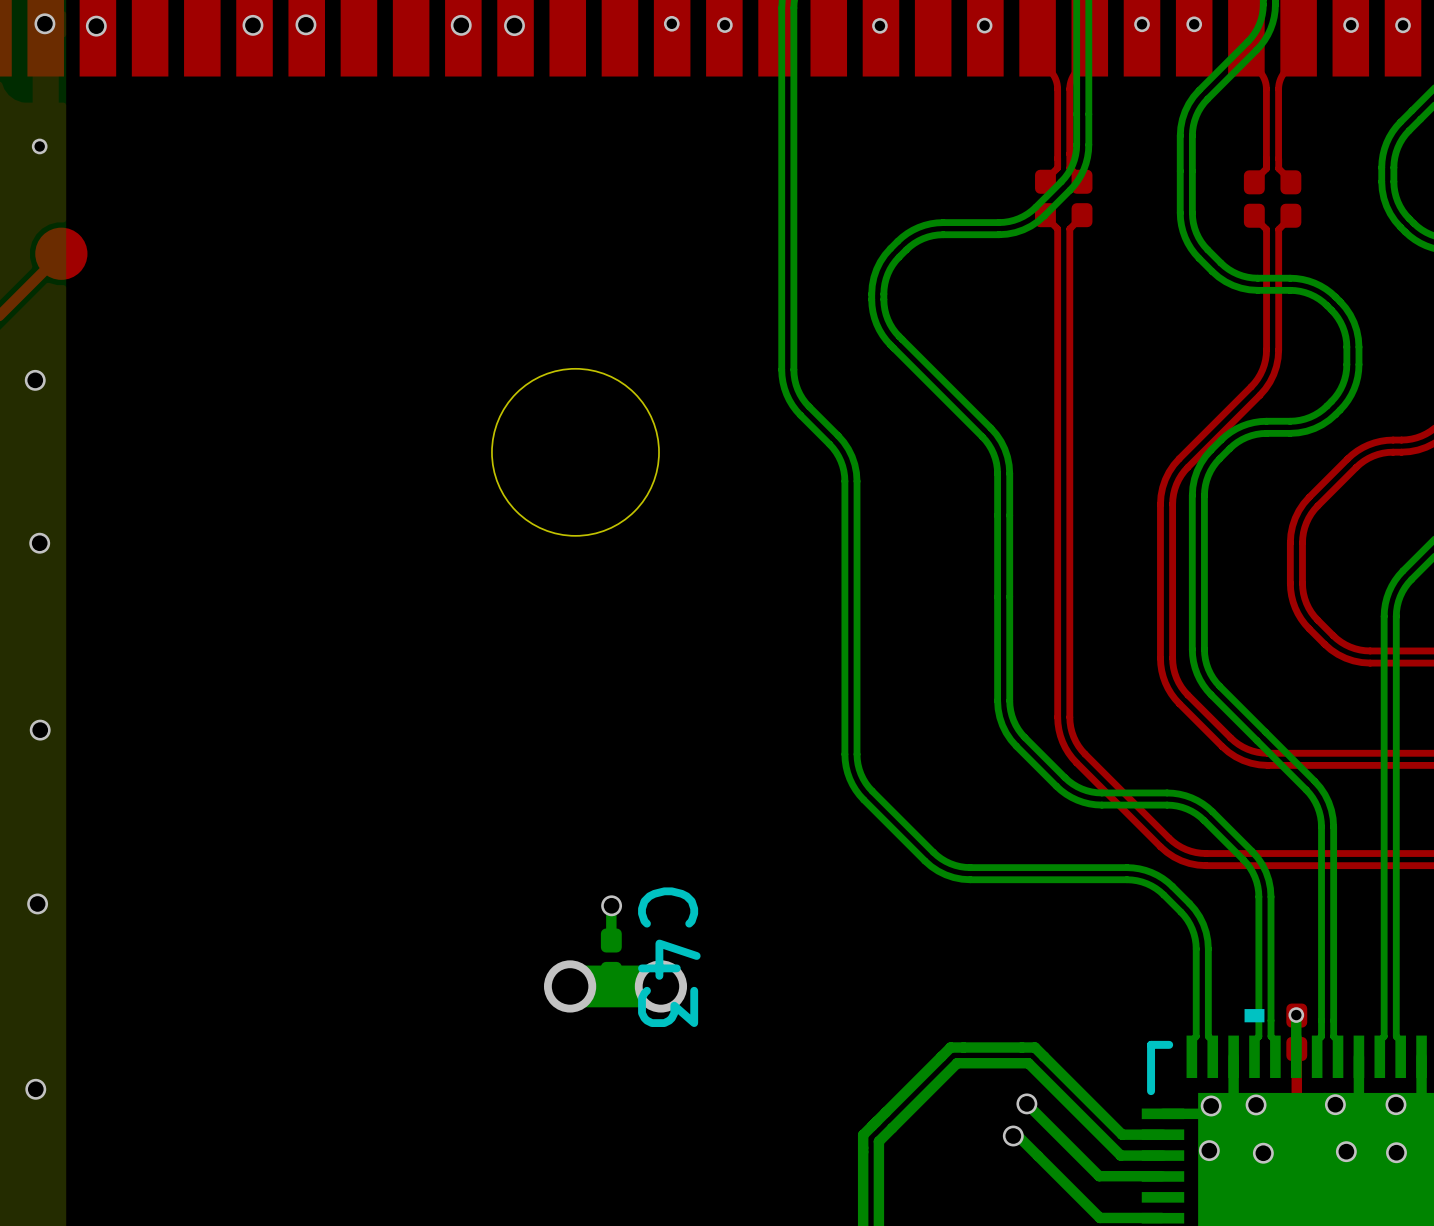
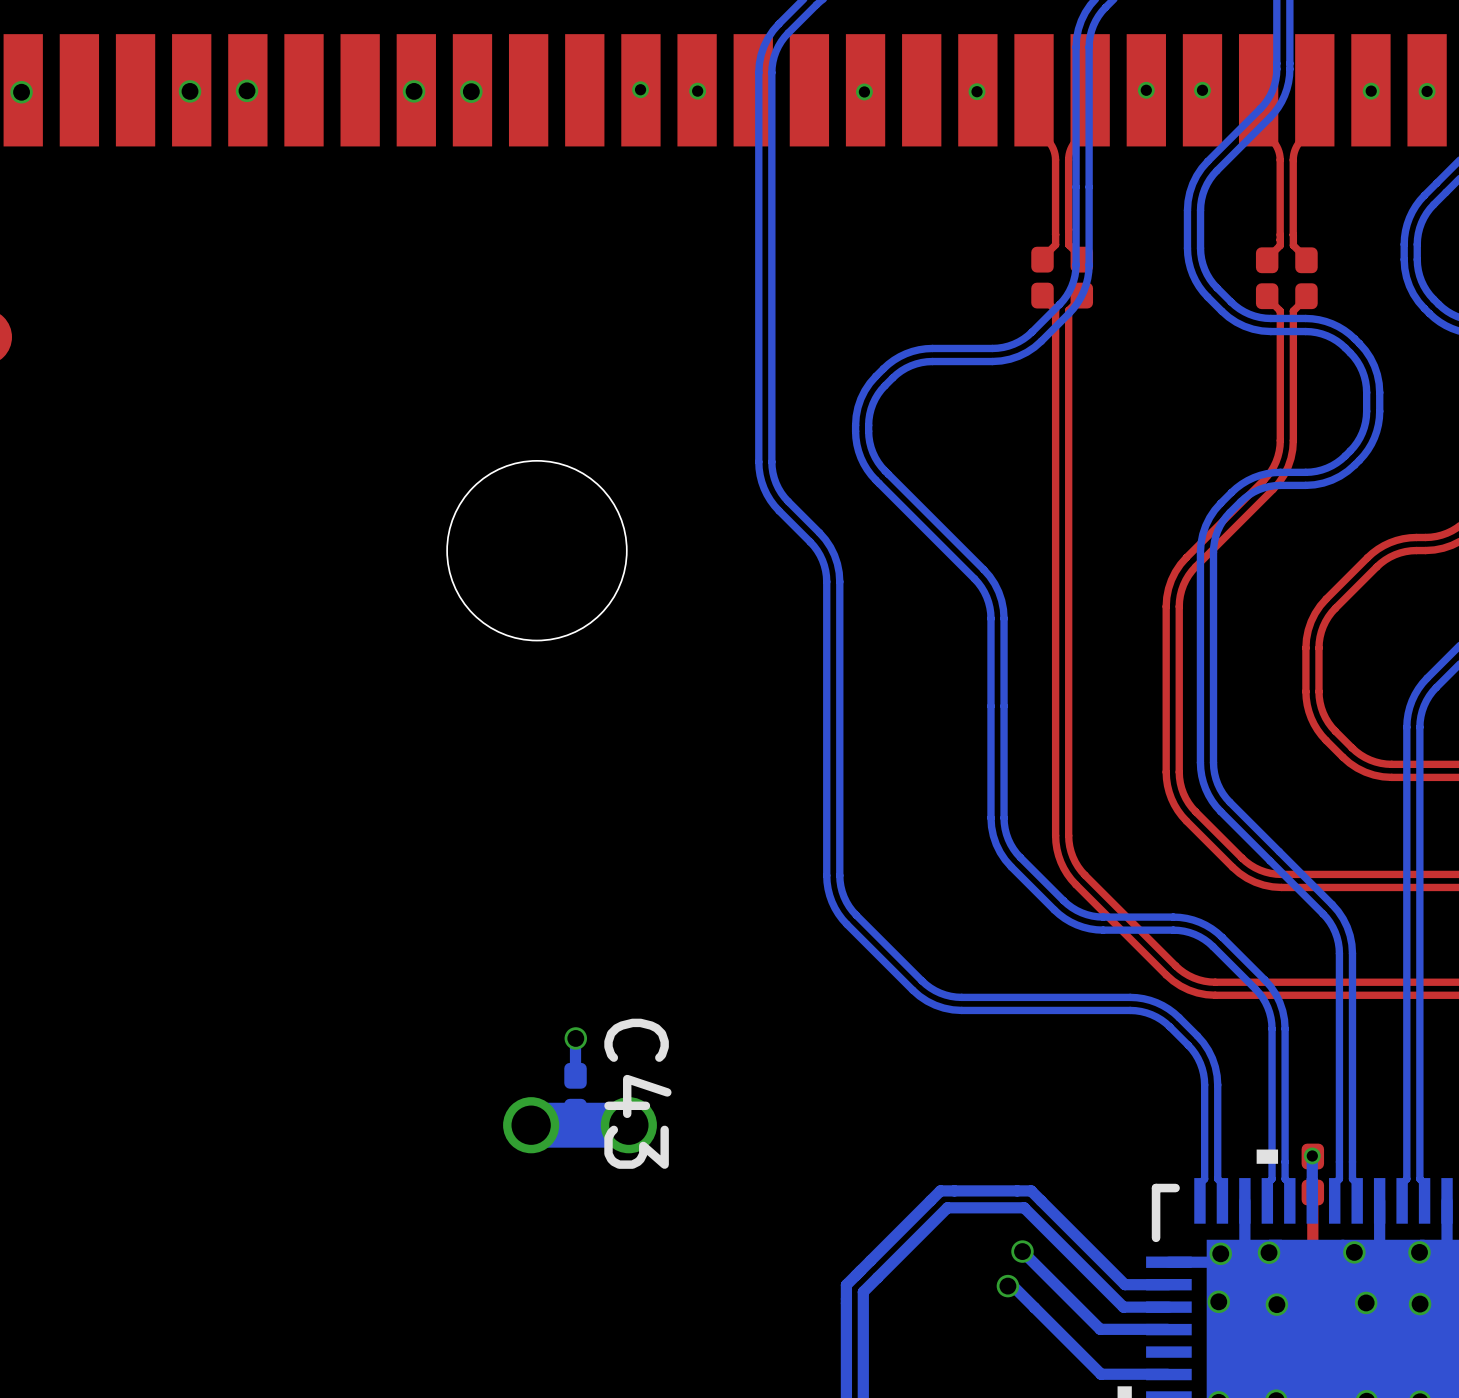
bottom track: (1076, 144) (1074, 159) (1067, 173) (1027, 213) (1018, 218) (1004, 222) (936, 222) (918, 227) (902, 237) (890, 248) (880, 261) (873, 277) (871, 294) (872, 312) (882, 335) (982, 436) (991, 449) (997, 468) (997, 515) -> (1076, 219) (1075, 270) (1071, 286) (1063, 300) (1028, 335) (1013, 344) (997, 348) (925, 348) (905, 353) (888, 364) (875, 376) (864, 390) (857, 407) (855, 425) (856, 444) (867, 469) (978, 582) (986, 597) (990, 618)
bottom track: (1088, 144) (1086, 163) (1077, 180) (1038, 221) (1023, 229) (1007, 234) (938, 234) (923, 238) (910, 246) (895, 260) (890, 269) (884, 283) (884, 309) (892, 328) (990, 428) (1001, 441) (1009, 465) (1009, 515) -> (1089, 219) (1088, 271) (1083, 291) (1073, 308) (1041, 341) (1026, 352) (1001, 360) (926, 361) (910, 365) (896, 374) (881, 389) (875, 398) (869, 414) (869, 442) (878, 462) (989, 576) (1001, 600) (1004, 618)
bottom track: (1180, 171) (1181, 225) (1187, 243) (1199, 258) (1218, 277) (1233, 285) (1249, 289) (1300, 291) (1319, 299) (1331, 310) (1340, 322) (1345, 336) (1346, 347) (1344, 379) (1338, 393) (1327, 405) (1314, 415) (1305, 419) (1254, 422) (1230, 432) (1211, 450) (1200, 463) (1194, 478) (1192, 495) -> (1187, 248) (1190, 268) (1195, 280) (1207, 297) (1228, 317) (1252, 329) (1270, 331) (1311, 331) (1332, 338) (1345, 347) (1357, 361) (1364, 376) (1366, 392) (1366, 416) (1362, 432) (1353, 446) (1341, 459) (1327, 468) (1316, 471) (1273, 472) (1253, 477) (1236, 488) (1214, 510) (1205, 525) (1201, 543) (1200, 597)
bottom track: (1192, 171) (1193, 223) (1198, 237) (1207, 249) (1224, 266) (1242, 275) (1302, 279) (1325, 289) (1340, 301) (1350, 314) (1356, 330) (1358, 347) (1358, 370) (1356, 383) (1348, 400) (1335, 414) (1322, 424) (1306, 431) (1256, 434) (1237, 442) (1213, 466) (1206, 480) (1204, 495) -> (1200, 248) (1202, 264) (1209, 279) (1231, 302) (1244, 311) (1265, 318) (1319, 319) (1332, 323) (1349, 334) (1370, 357) (1377, 374) (1379, 392) (1379, 418) (1374, 437) (1364, 455) (1347, 471) (1323, 483) (1274, 485) (1258, 489) (1244, 498) (1226, 516) (1220, 525) (1214, 541) (1213, 597)

